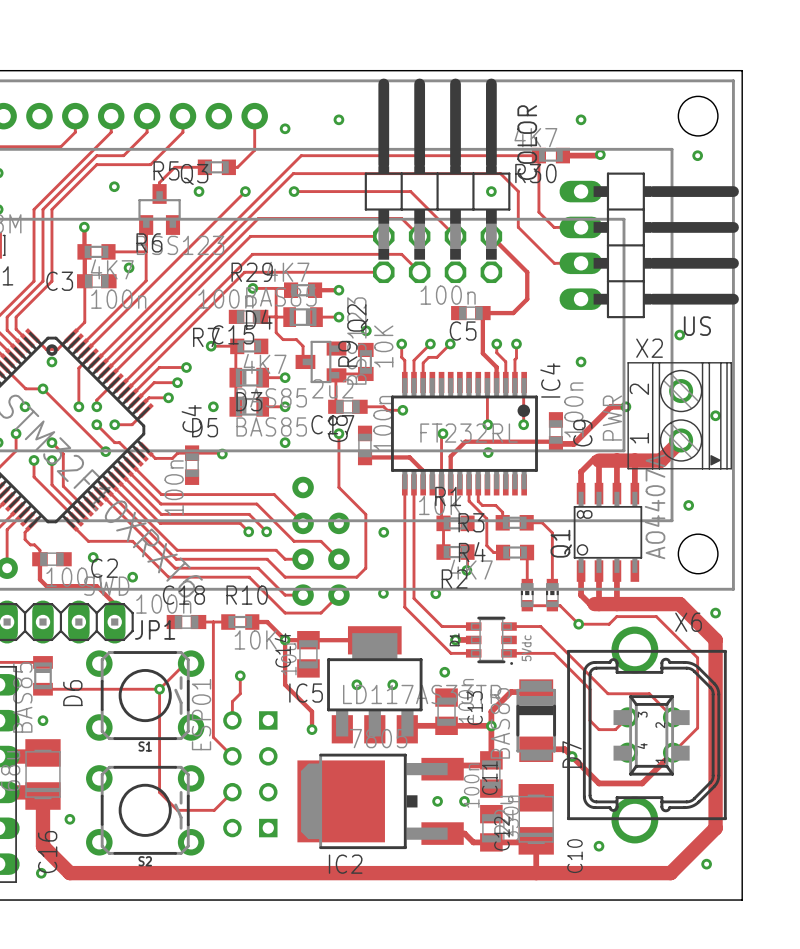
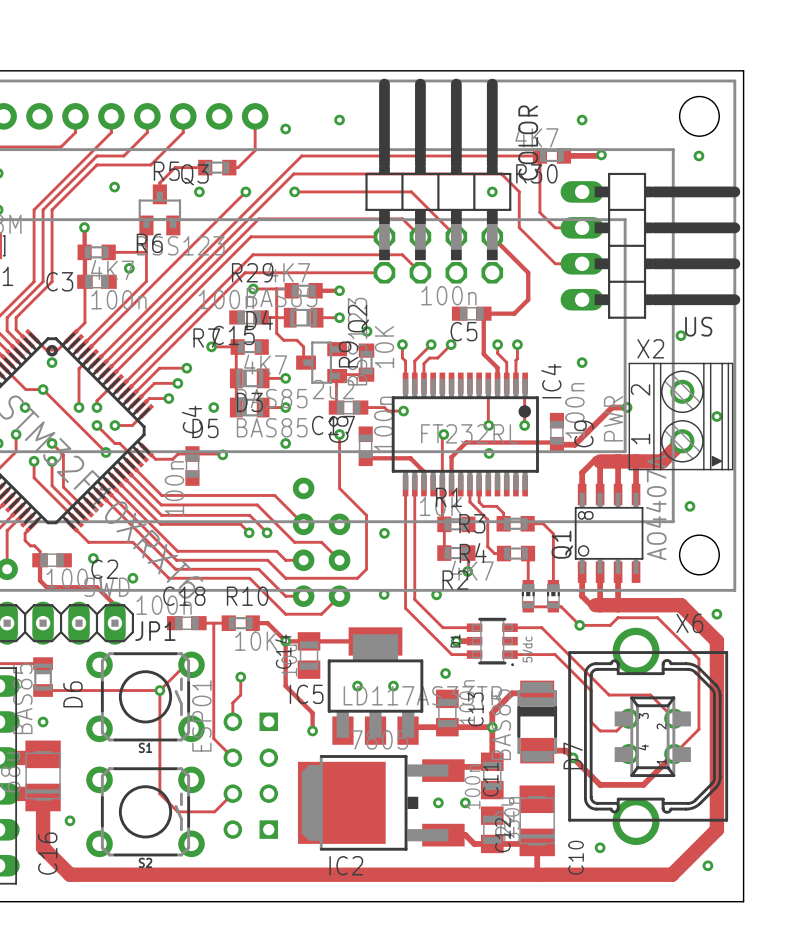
via: (41, 873) -> none

